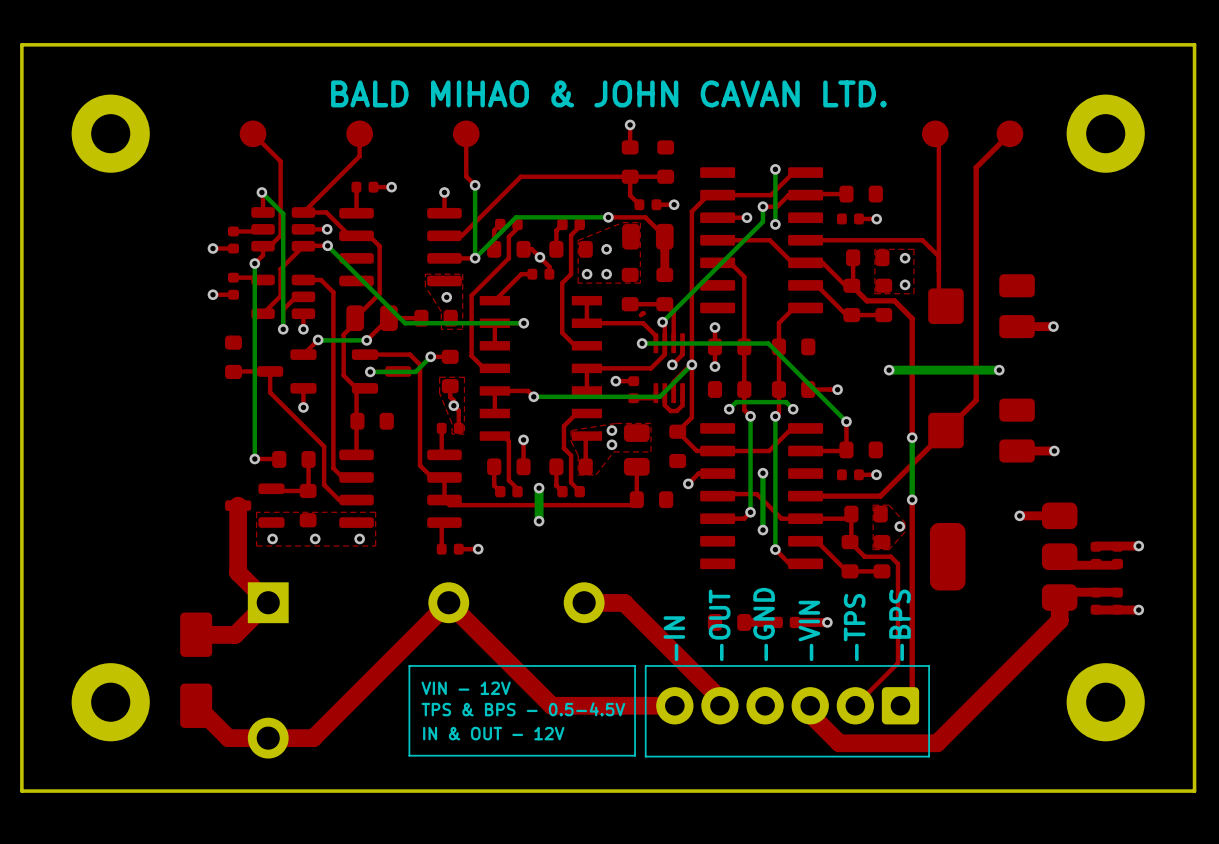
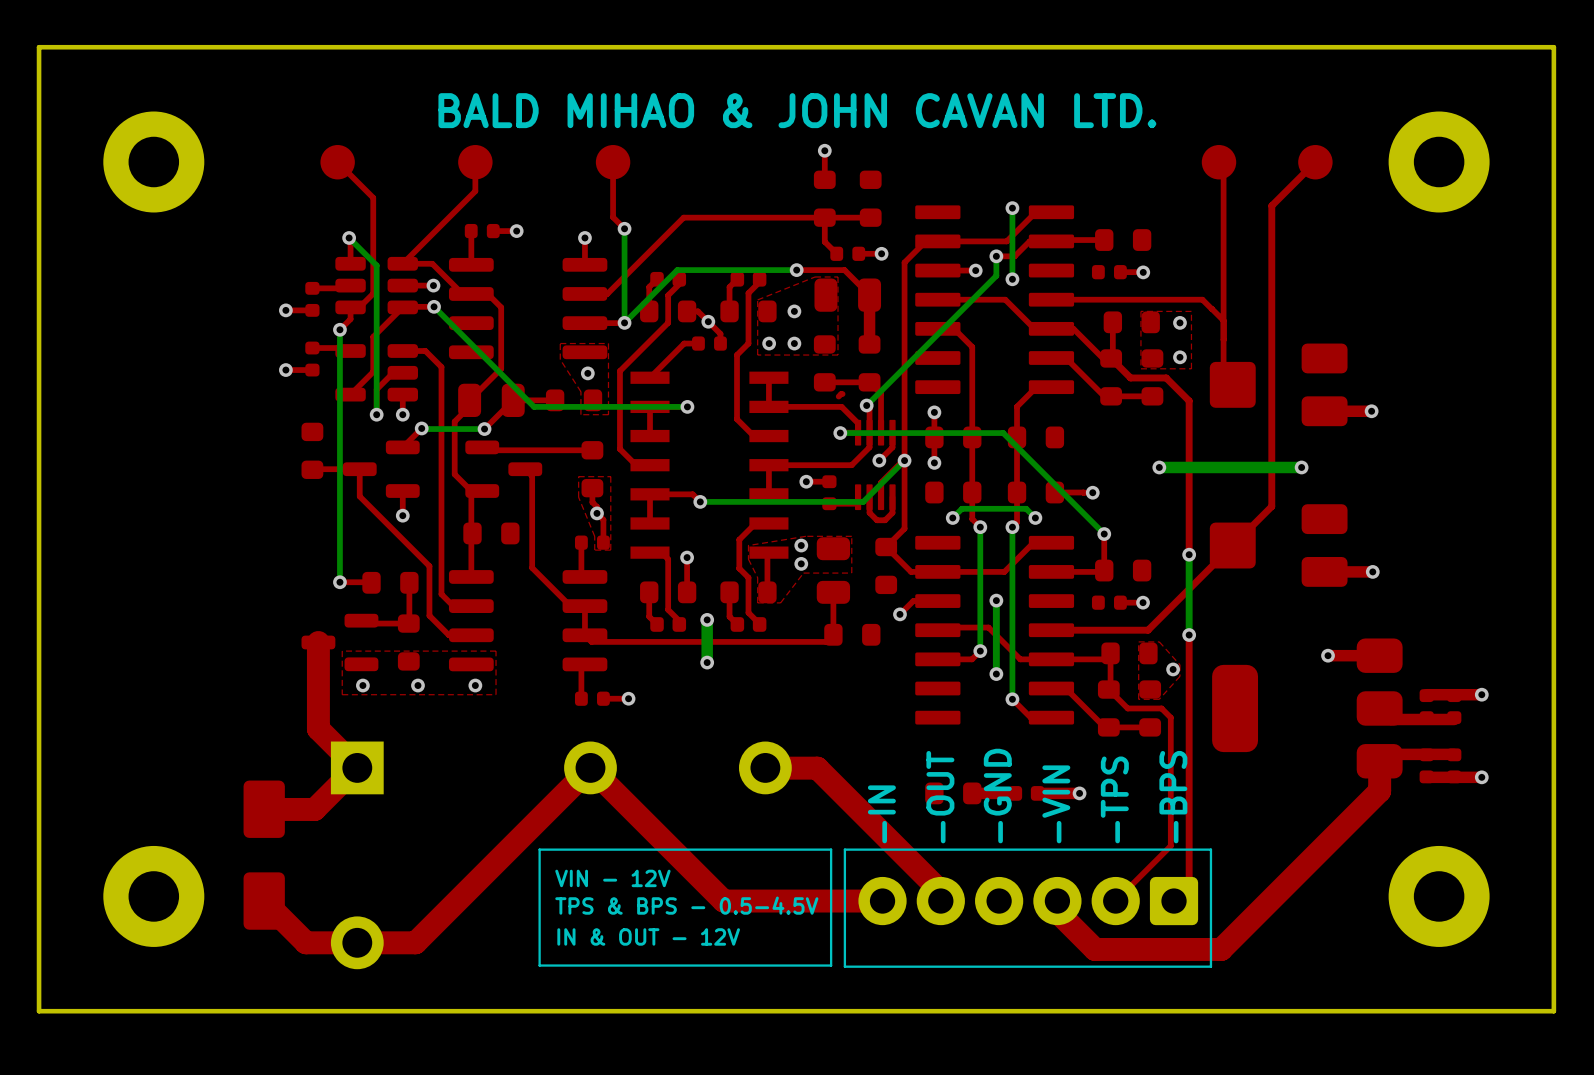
top track: (364, 354) (409, 354) (420, 364) (420, 465) (433, 477) -> (525, 469) (532, 476) (532, 567) (570, 606)
top track: none -> (482, 447) (485, 450) (567, 450)
bottom track: (430, 356) (415, 371) (370, 371) -> none
via: (430, 356) -> none
via: (370, 371) -> none

